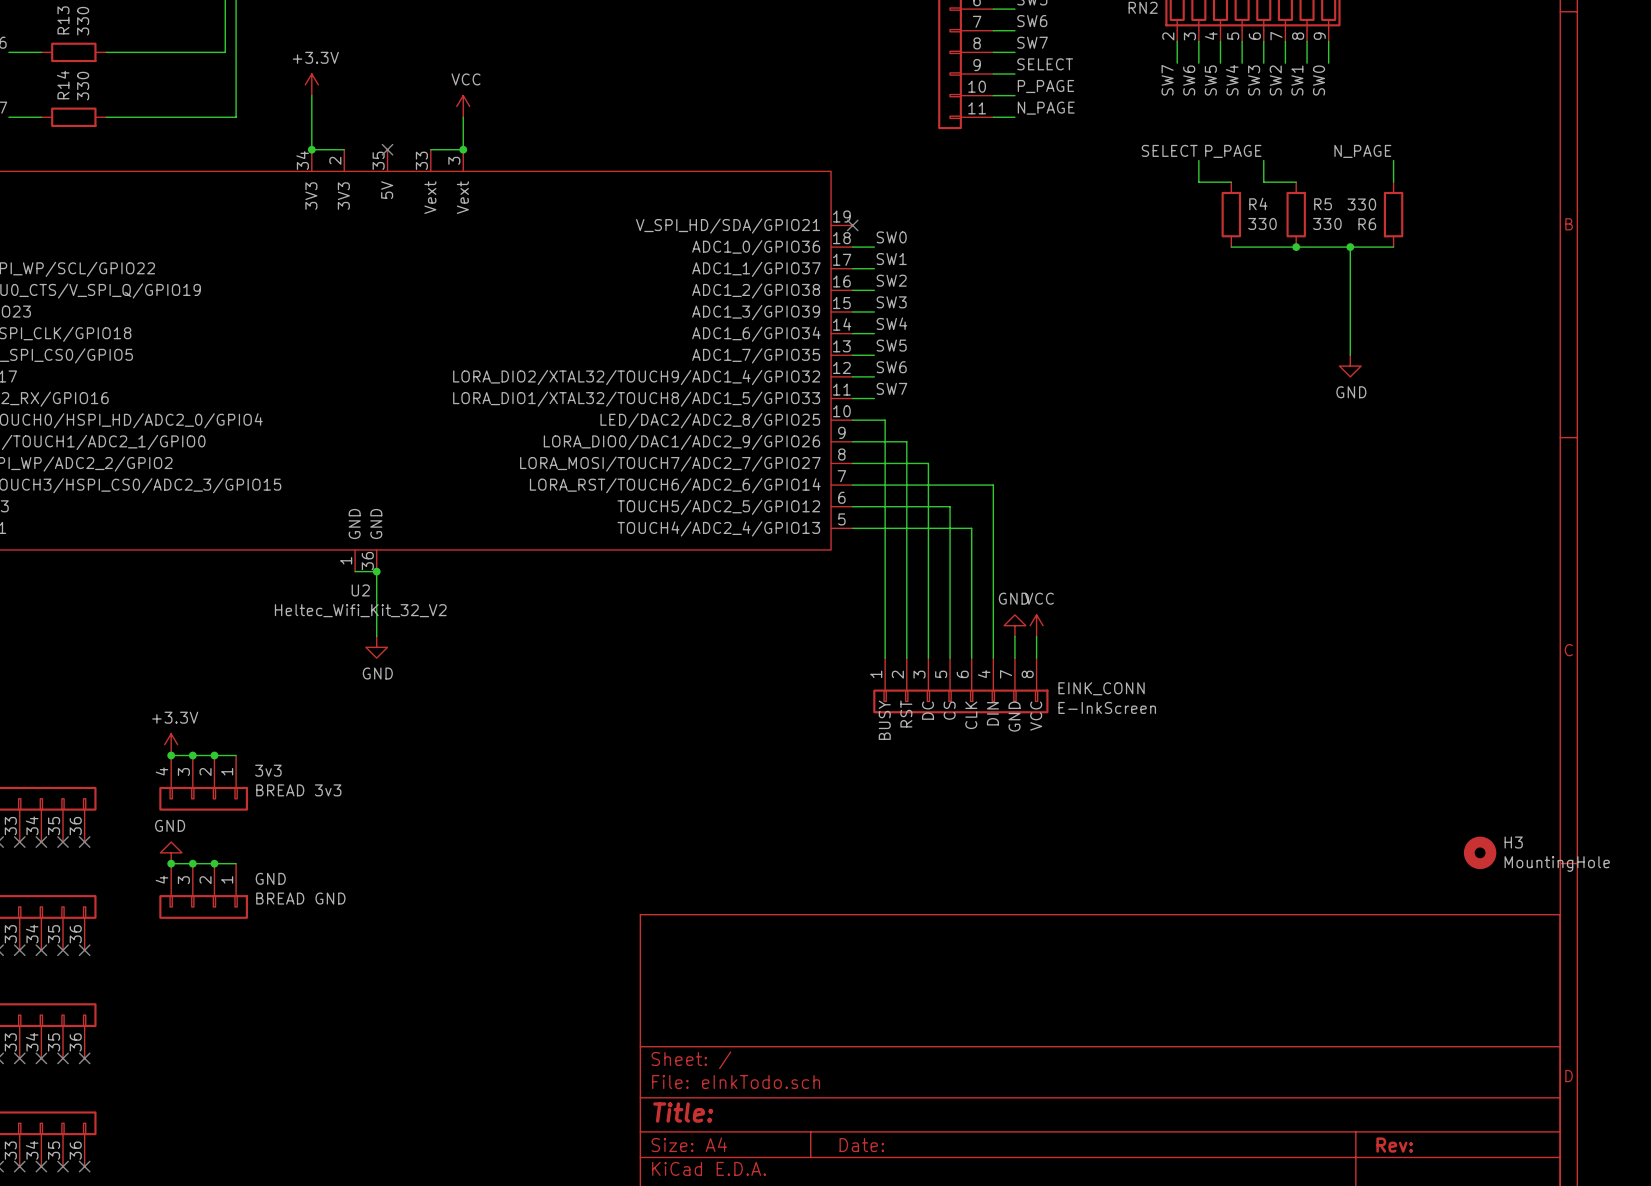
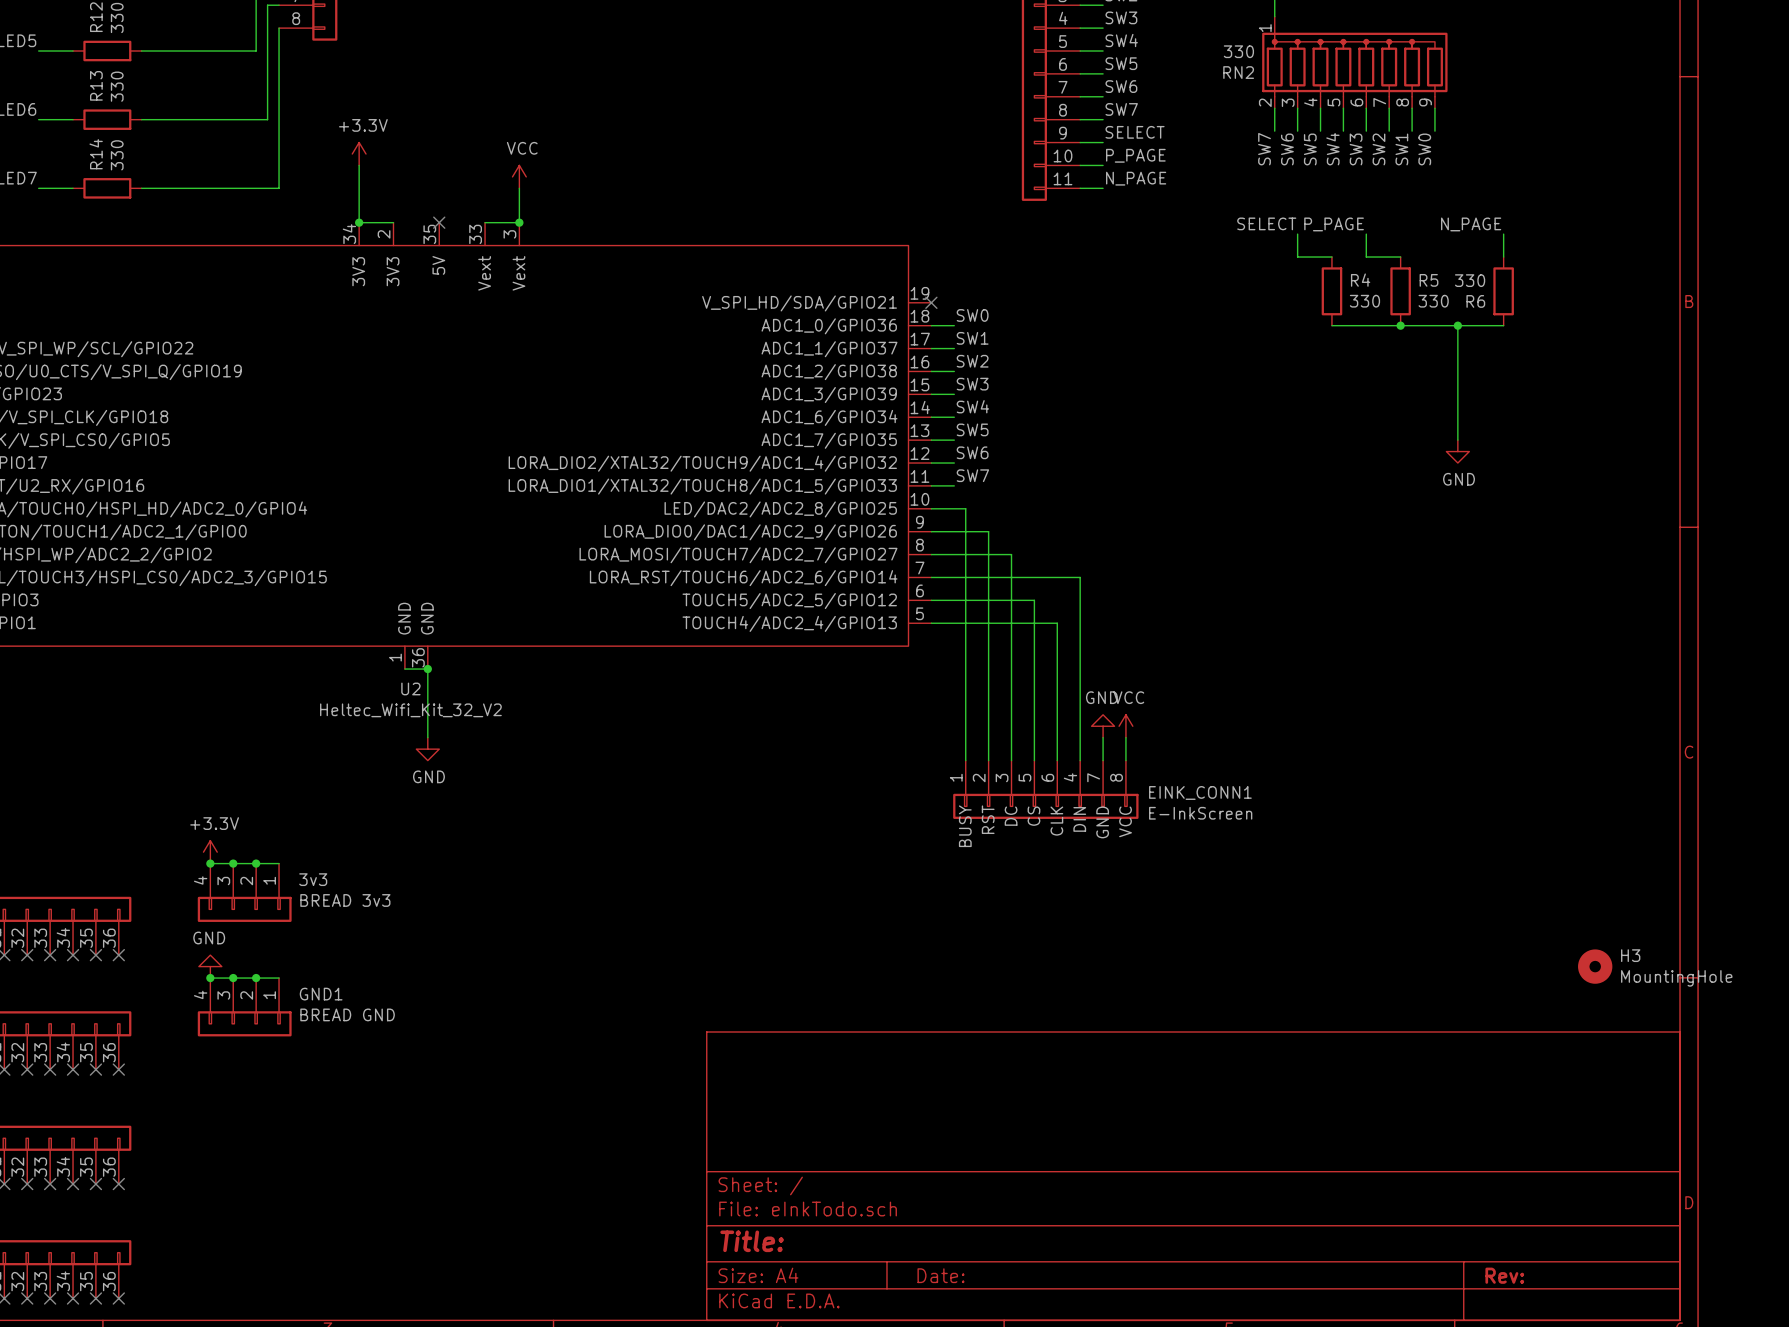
EINK_CONN name: EINK_CONN (1101, 688) -> EINK_CONN1 (1200, 792)
GND name: GND (270, 878) -> GND1 (321, 994)

